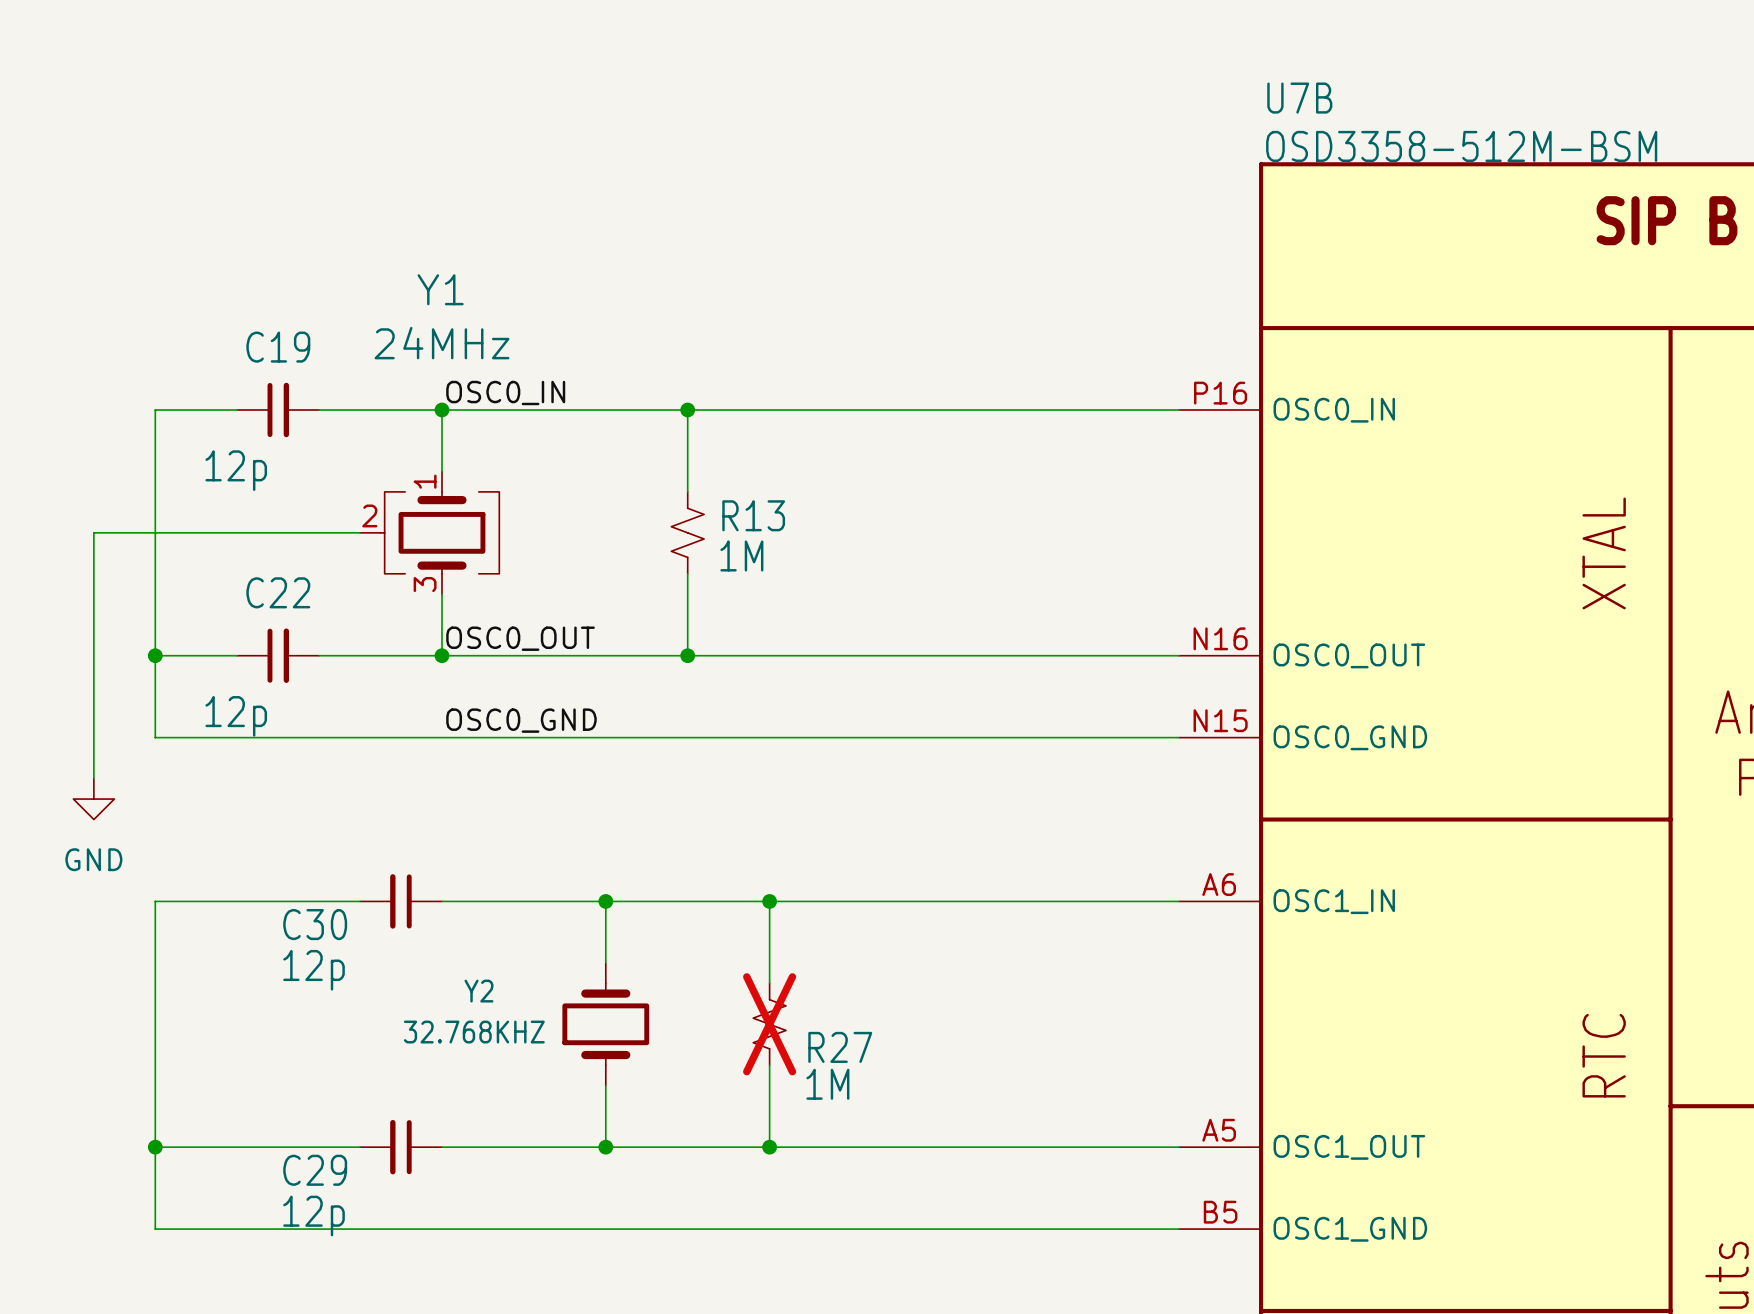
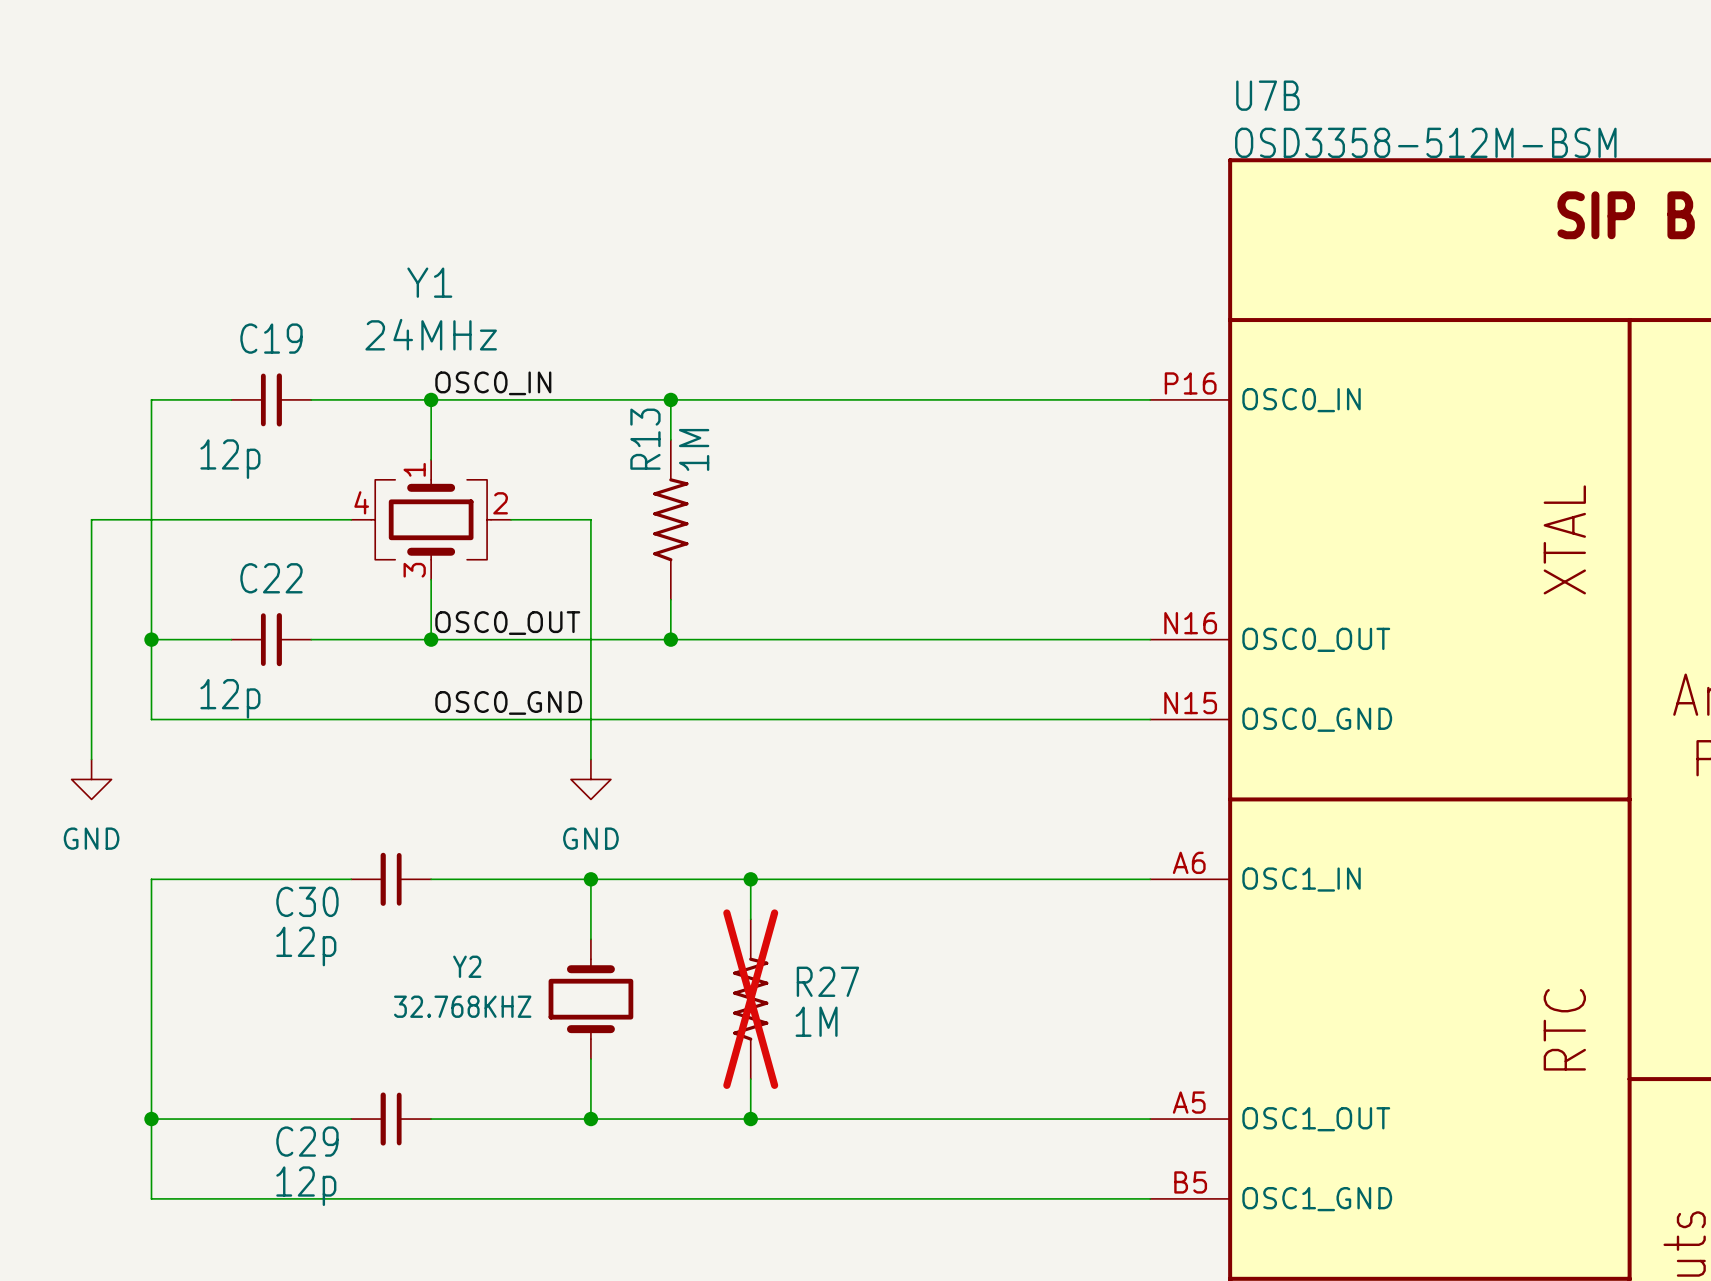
Y1 symbol: [360, 471, 500, 595] -> [351, 459, 512, 580]
R13 symbol: [671, 491, 705, 574] -> [653, 439, 689, 600]
R13 name position: R13 (753, 515) -> R13 (645, 439)
wire: none -> (511, 519) (590, 519) (590, 759)
R13 value position: 1M (741, 555) -> 1M (694, 449)
power symbol: none -> GND (590, 779)
R27 symbol: [753, 983, 786, 1066] -> [733, 919, 769, 1080]
R27 name position: R27 (840, 1047) -> R27 (827, 981)
R27 value position: 1M (827, 1084) -> 1M (816, 1021)

